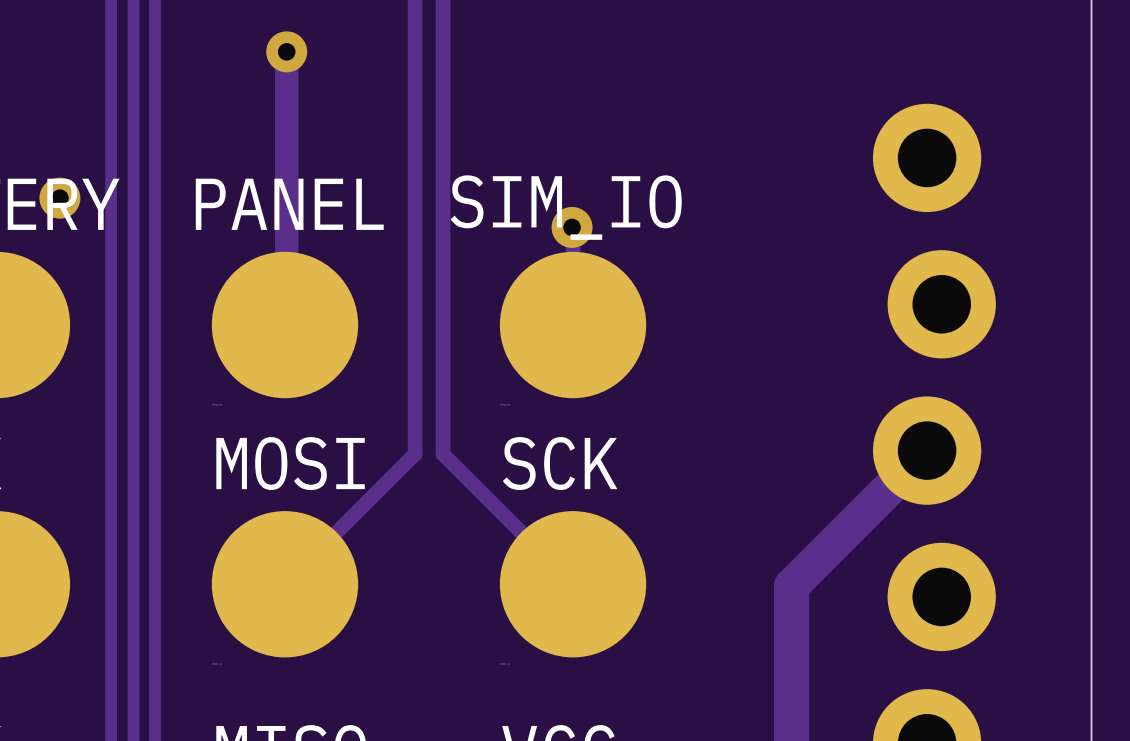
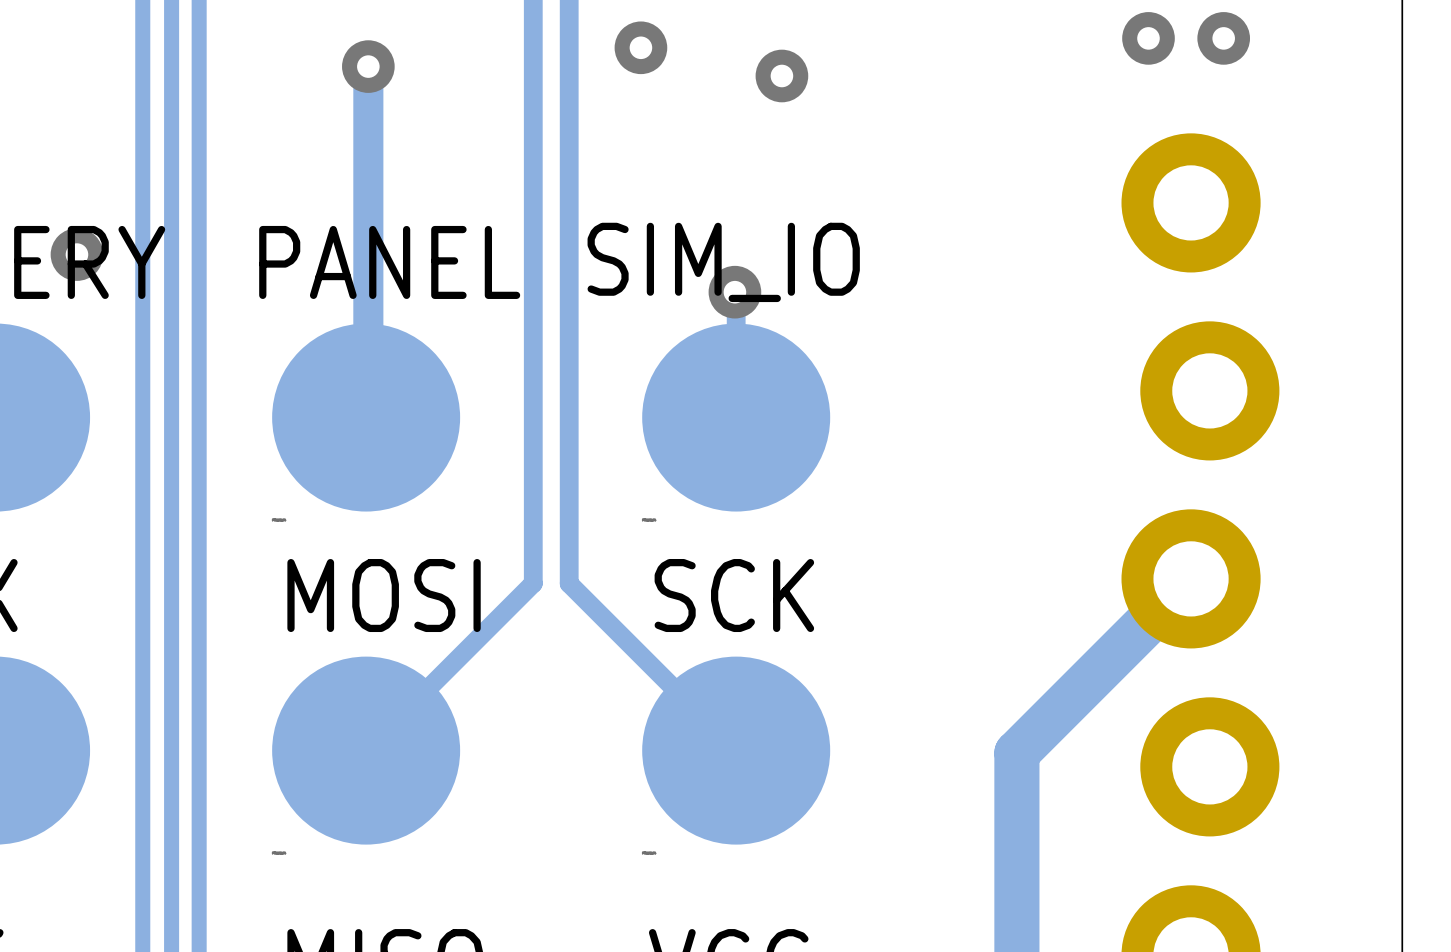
via: none -> (1148, 38)
via: none -> (1223, 38)
via: none -> (640, 47)
via: none -> (781, 75)

